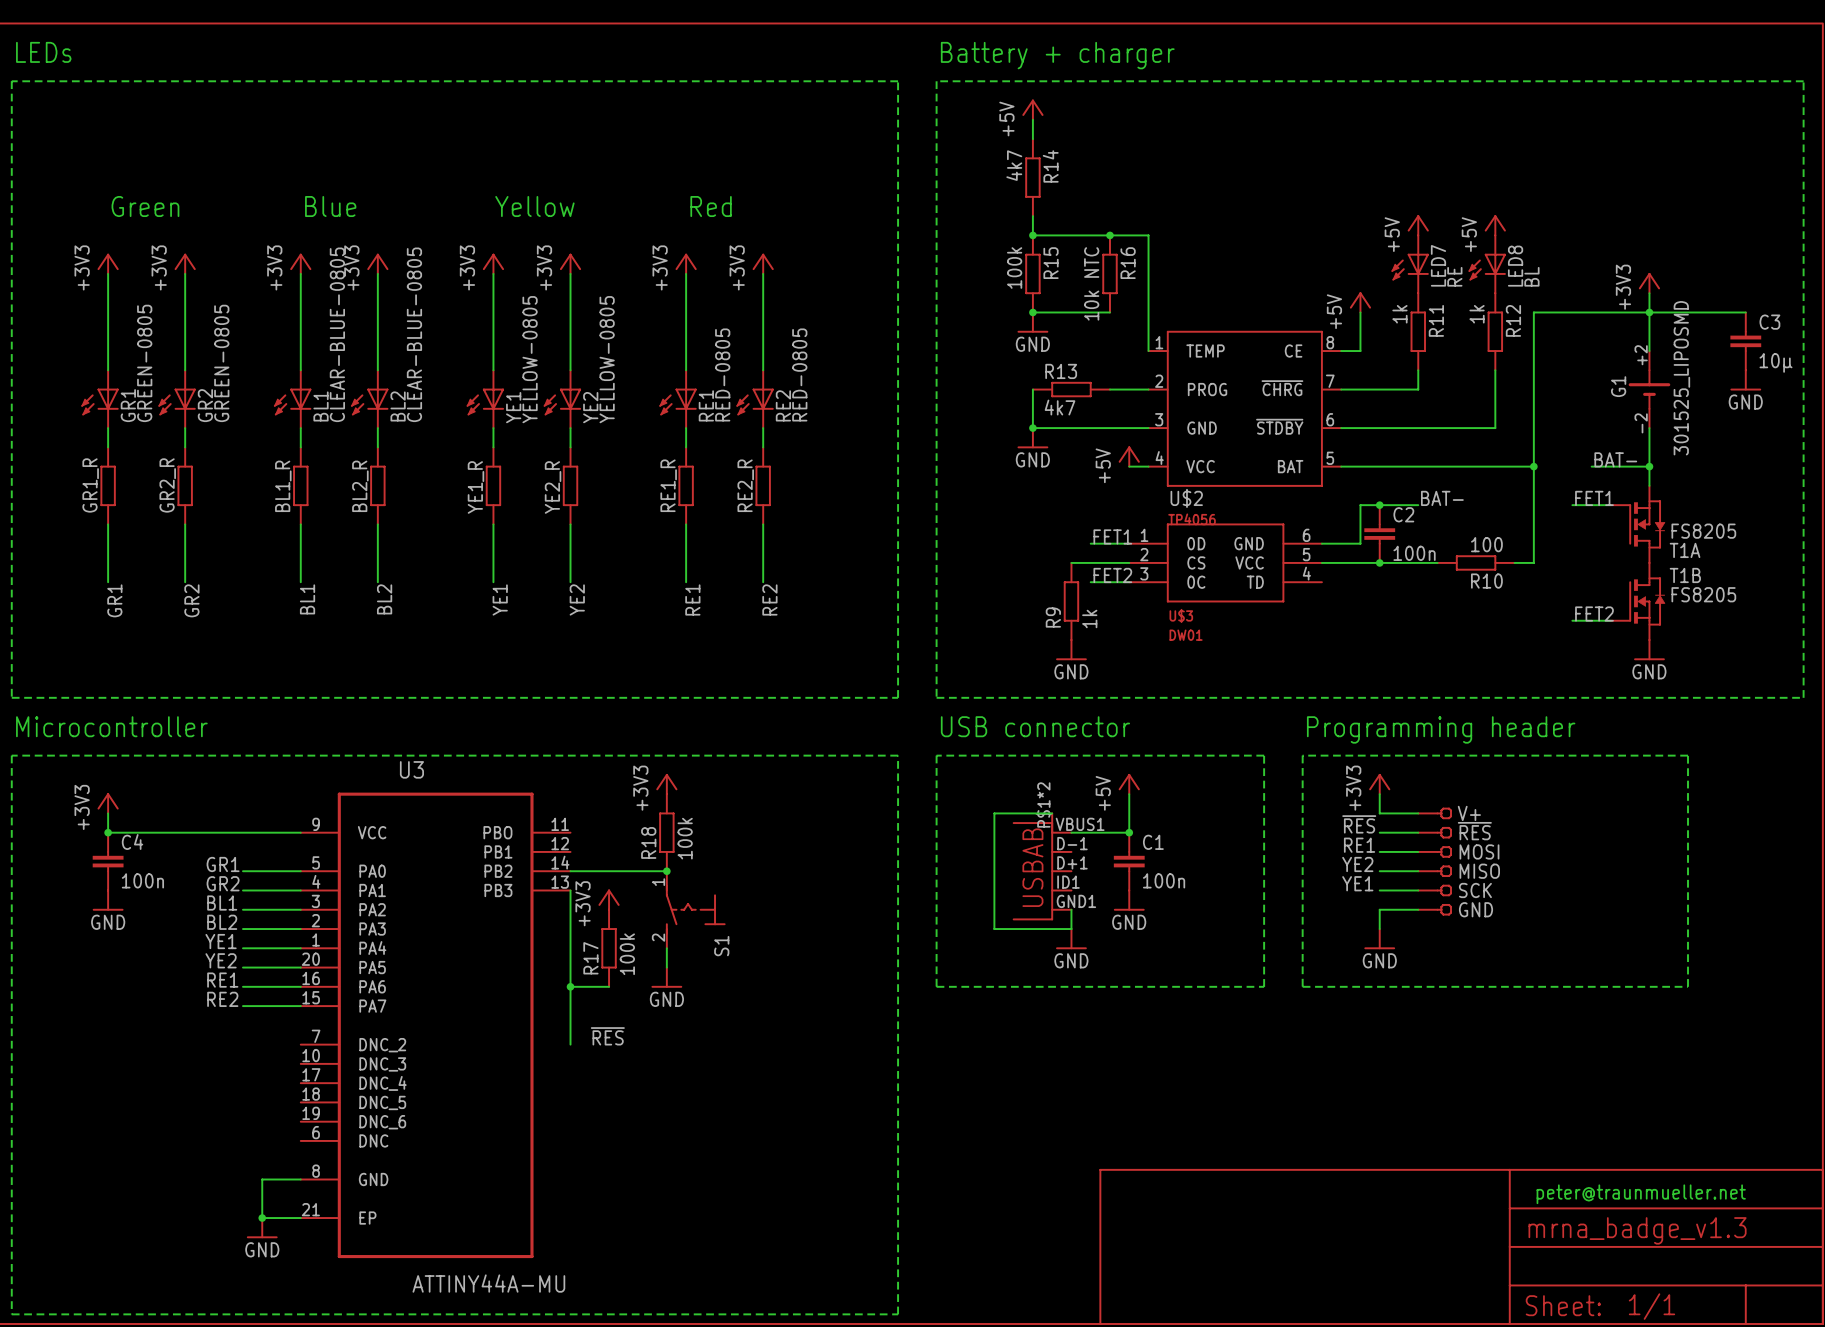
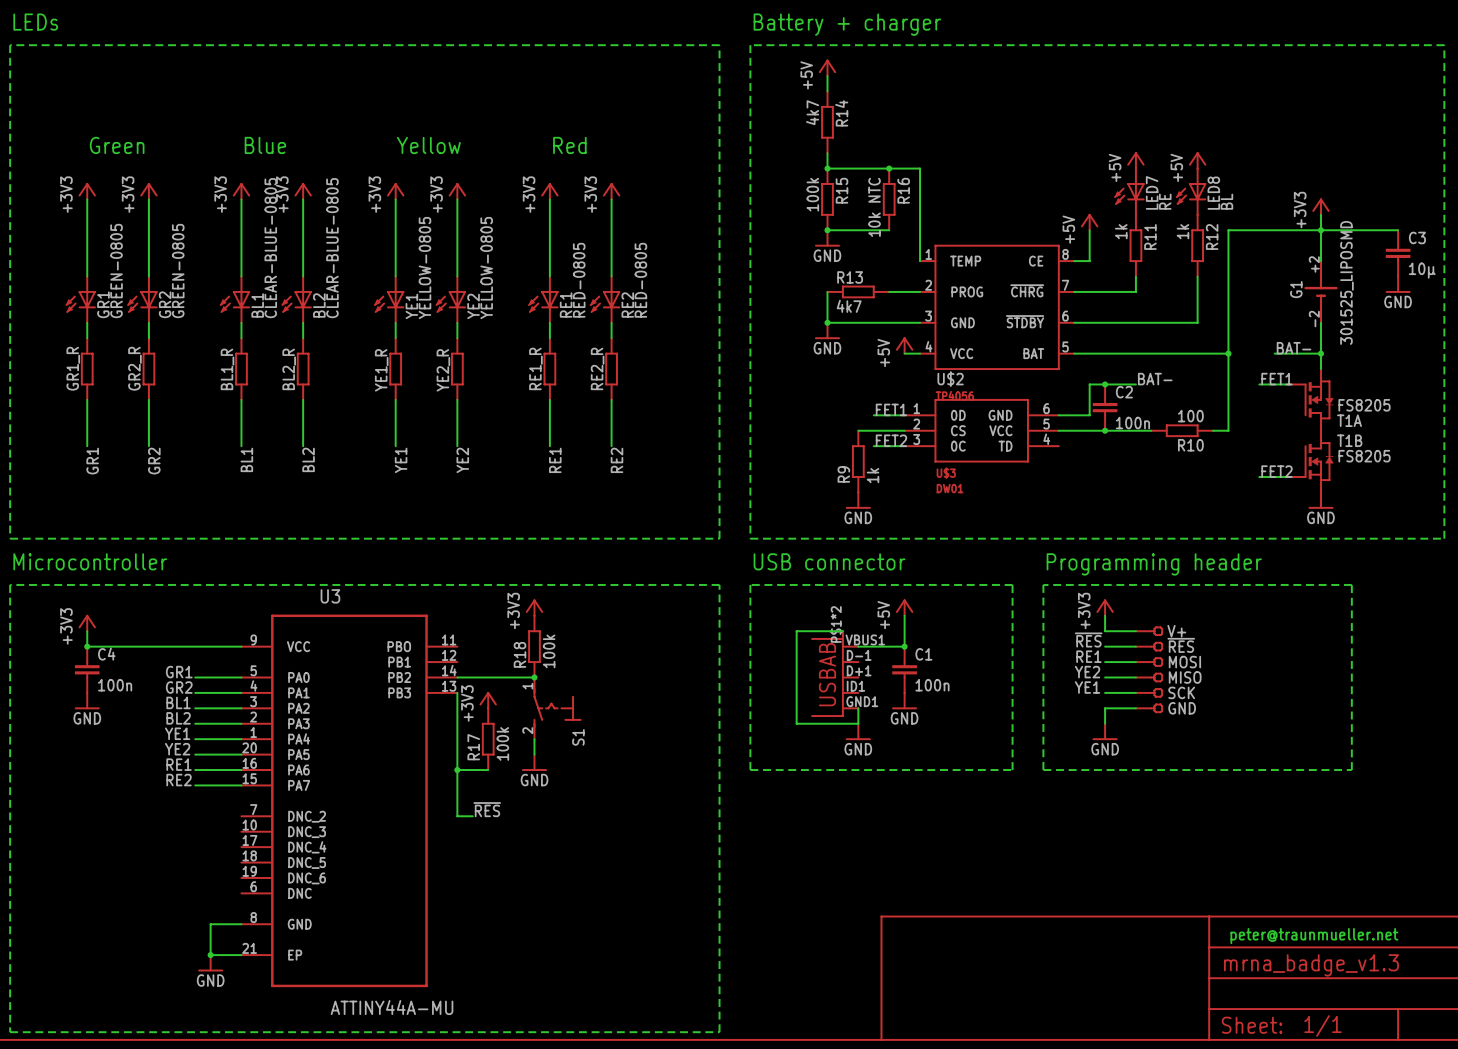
wire: none -> (457, 816) (472, 816)

